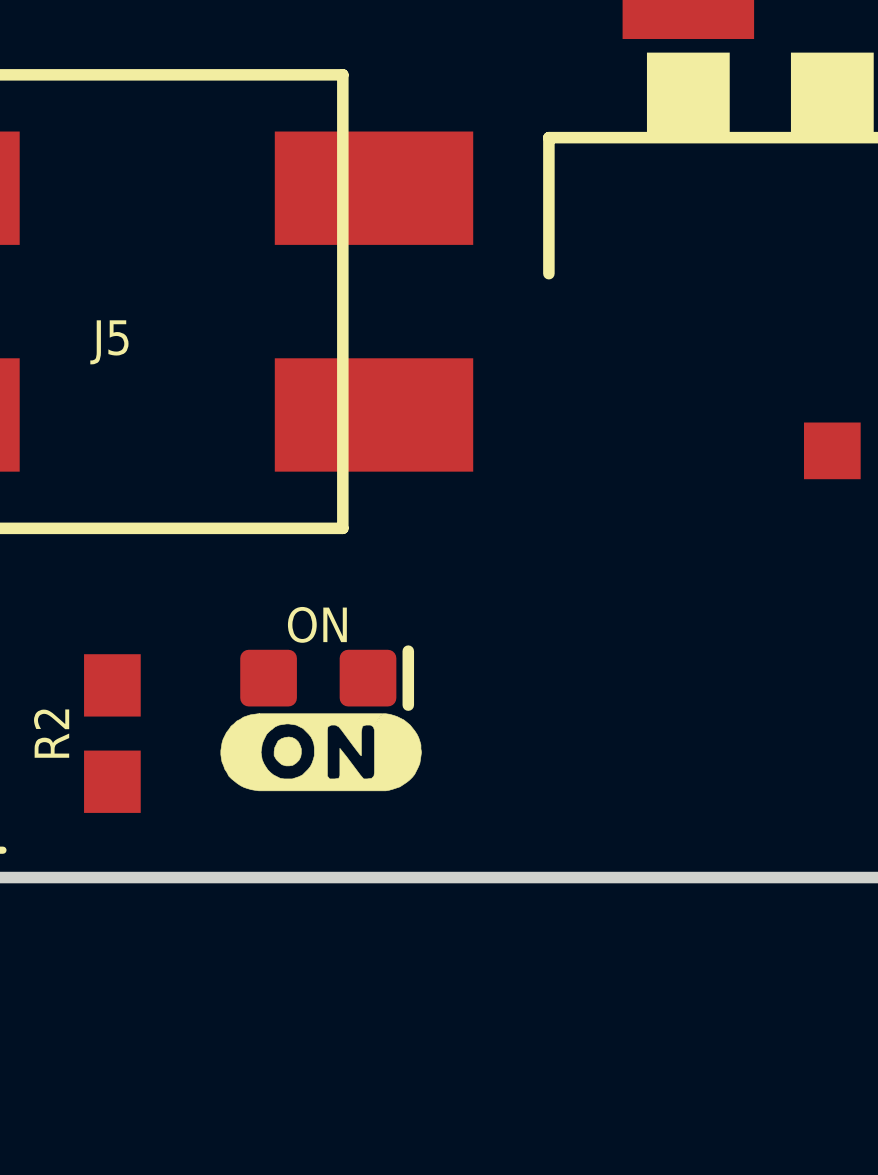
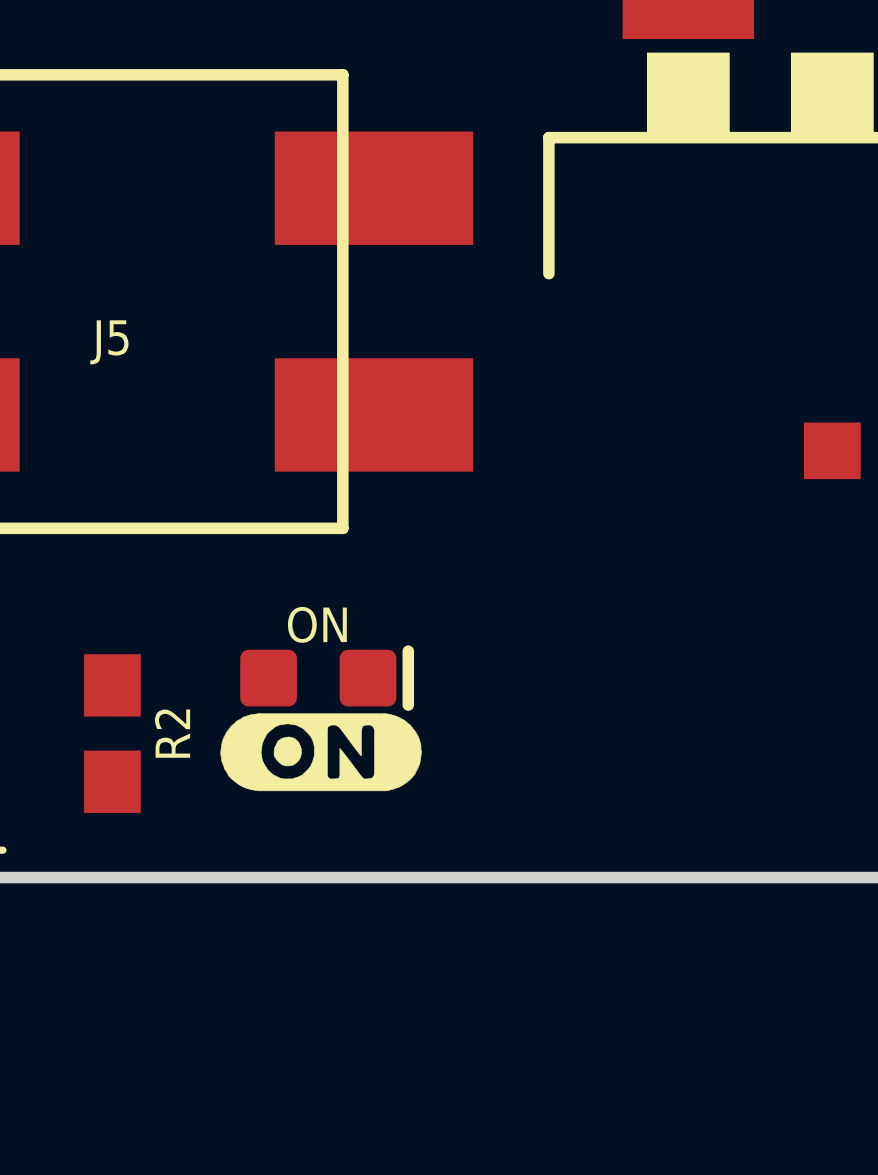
R2 name position: R2 (51, 733) -> R2 (172, 733)

